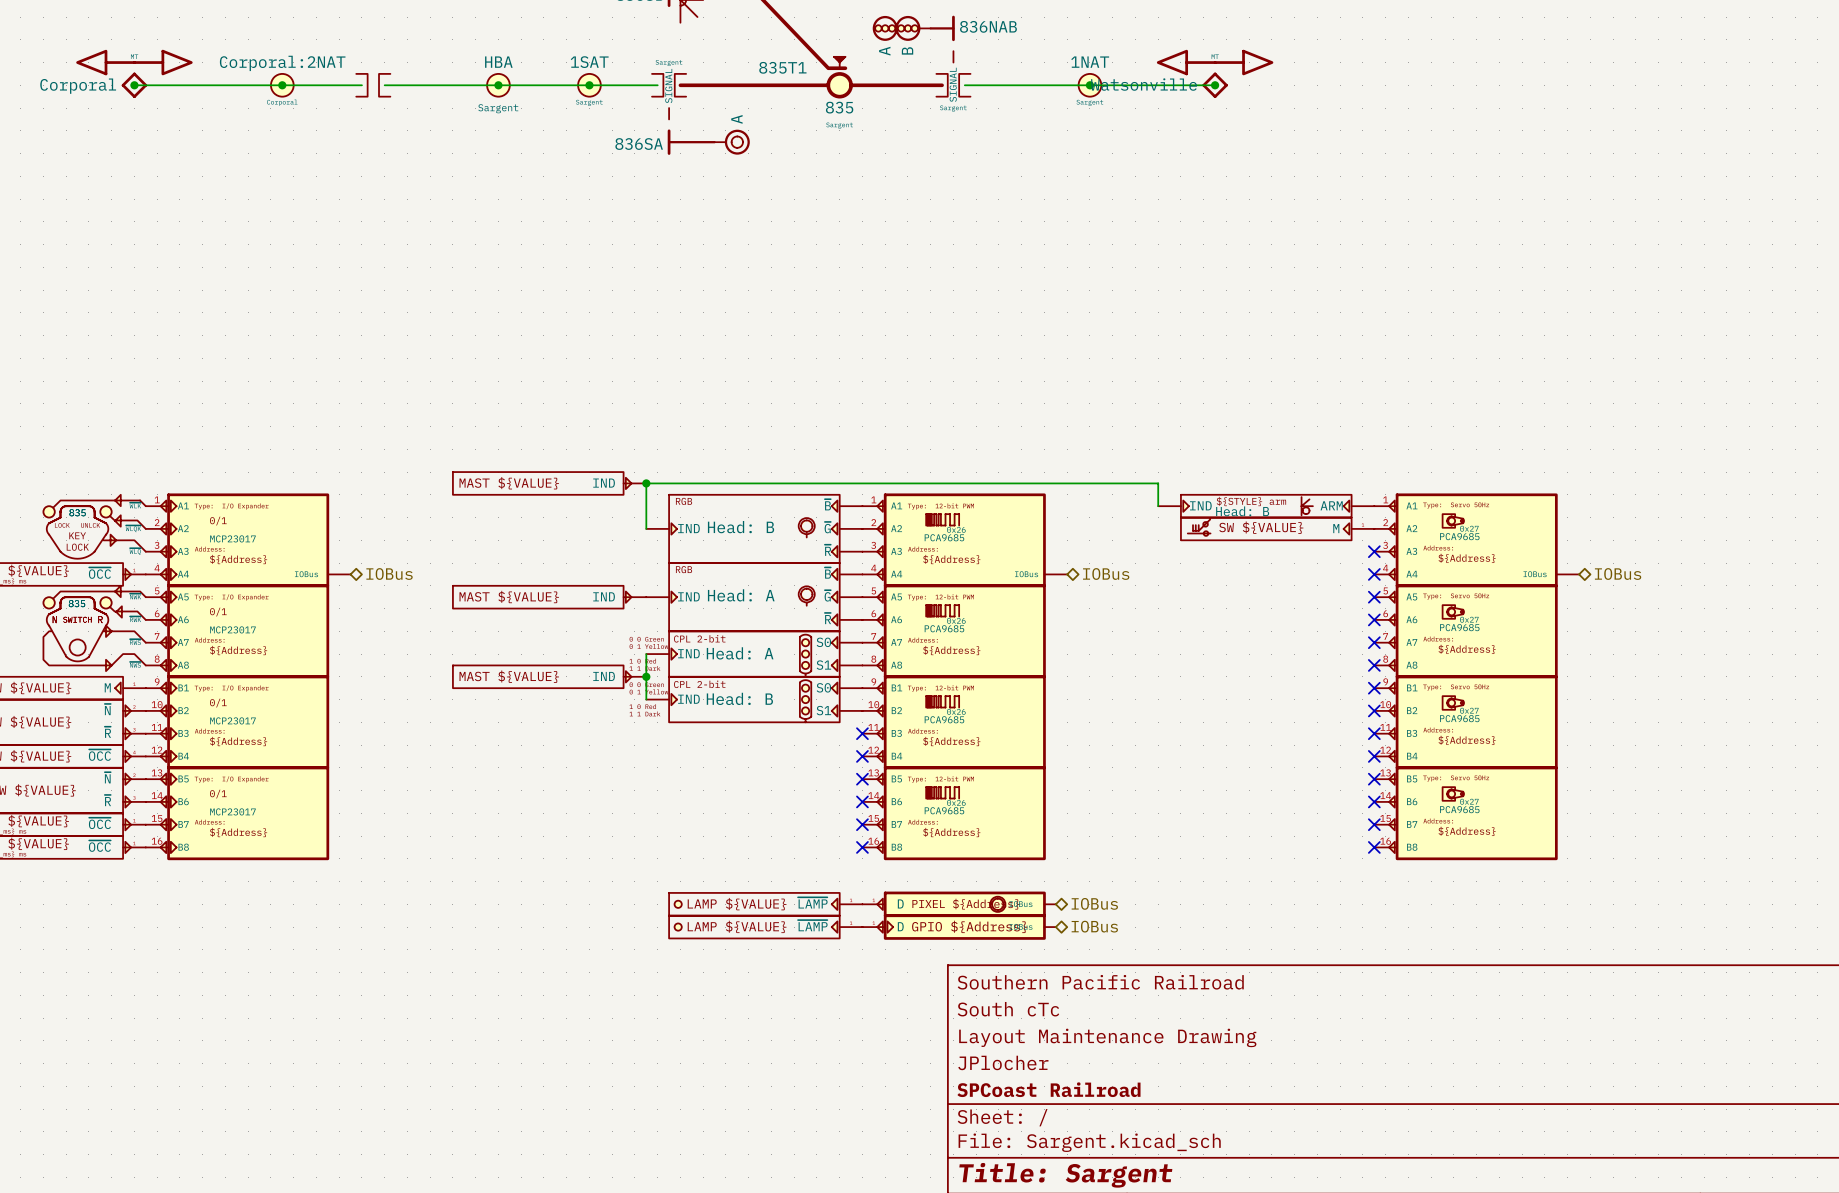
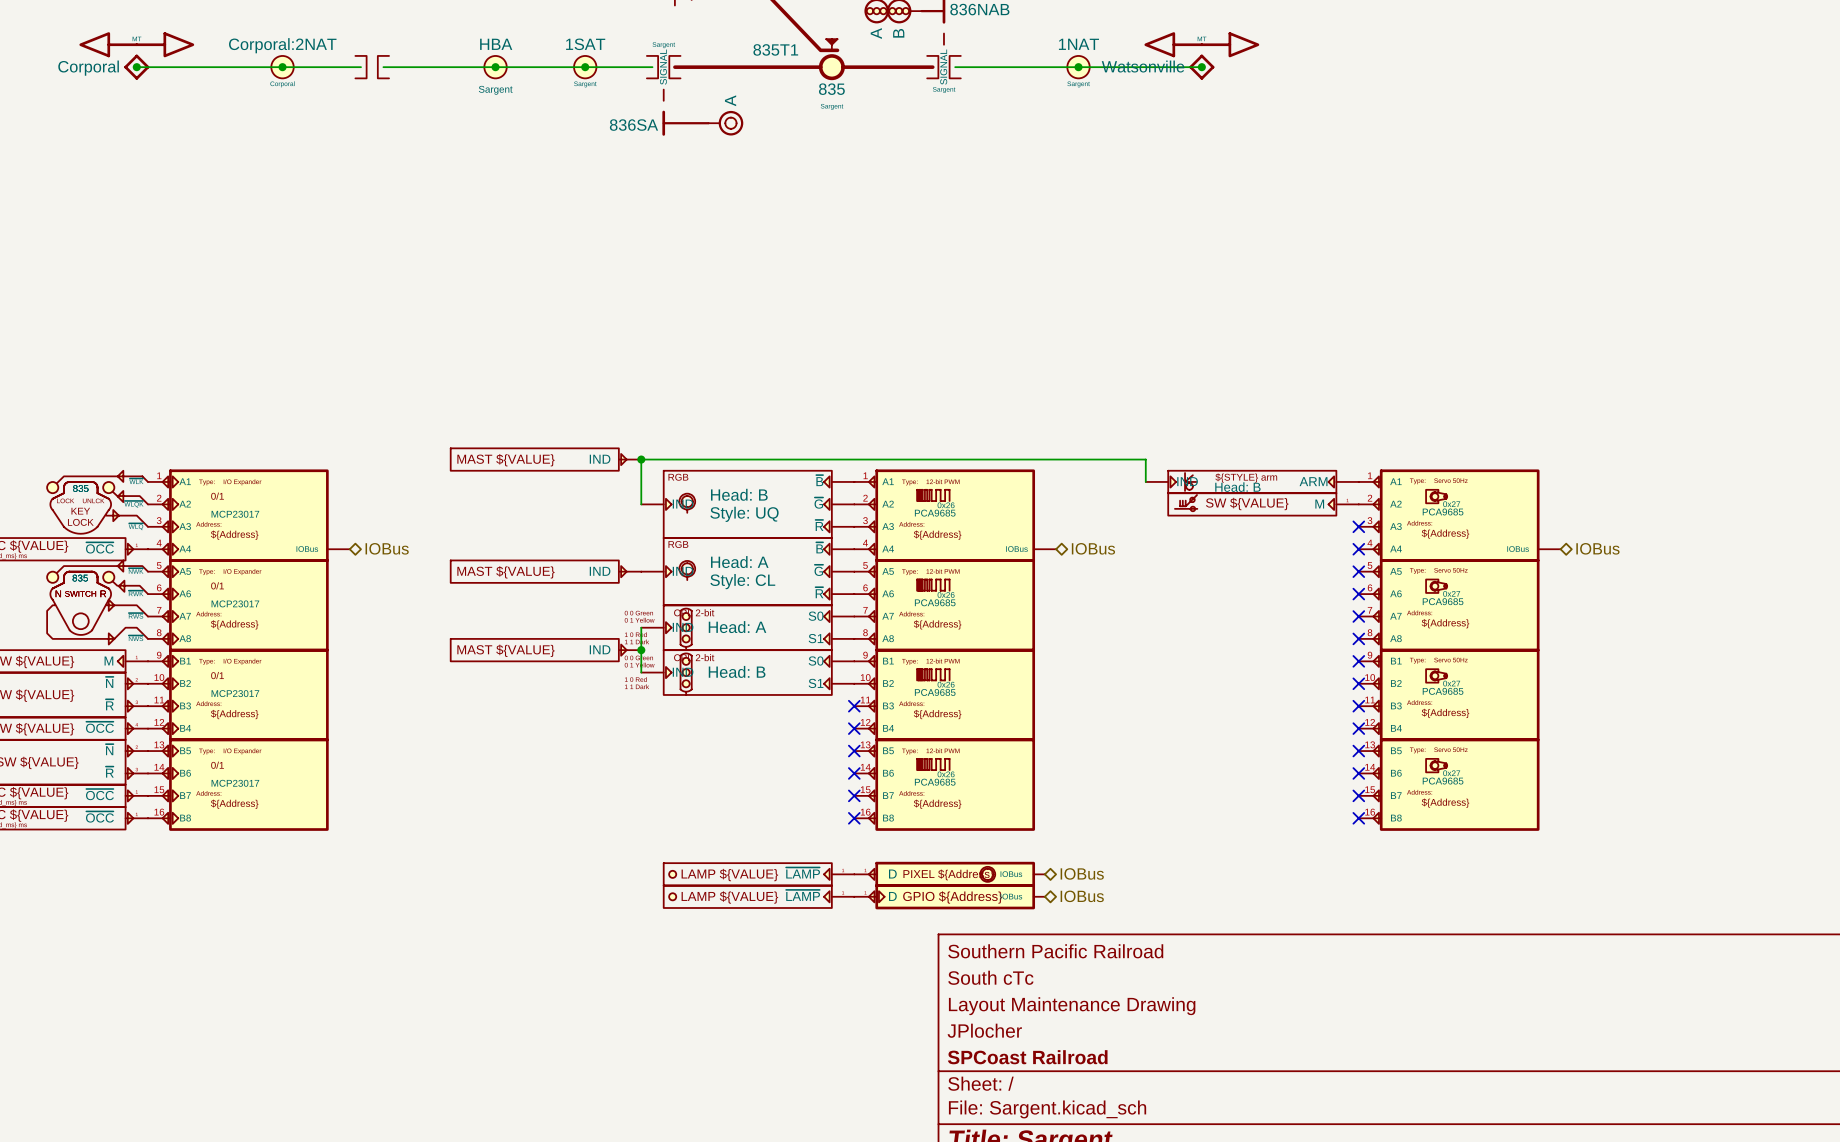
part symbol: [646, 494, 863, 564] -> [641, 470, 855, 539]
part symbol: [1158, 494, 1375, 518] -> [1145, 470, 1359, 494]
part text: none -> Style: UQ (744, 514)
part symbol: [646, 563, 863, 632] -> [641, 538, 855, 606]
part text: none -> Style: CL (742, 581)
part symbol: [646, 631, 863, 677] -> [641, 605, 855, 651]
part symbol: [646, 676, 863, 723] -> [641, 650, 855, 695]

